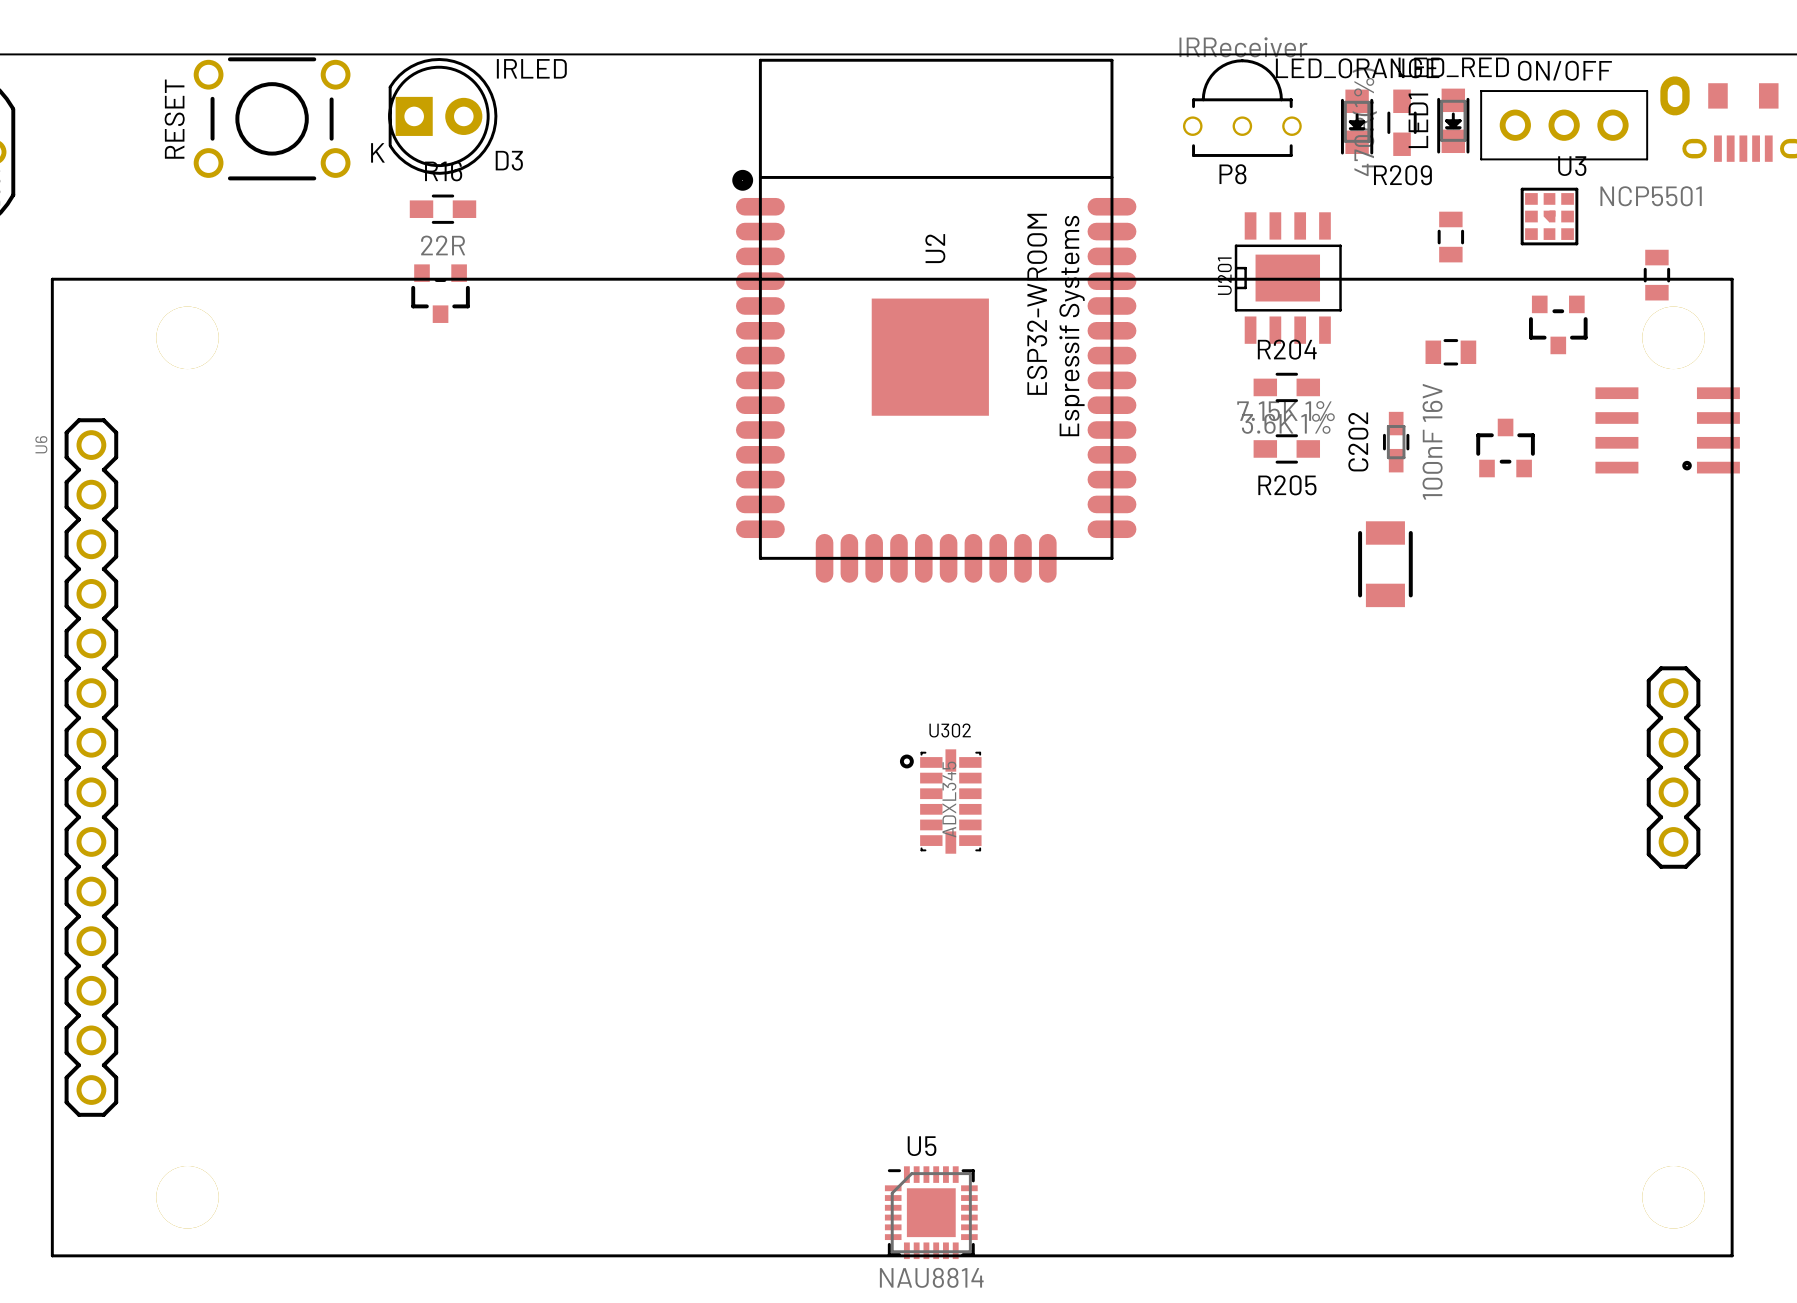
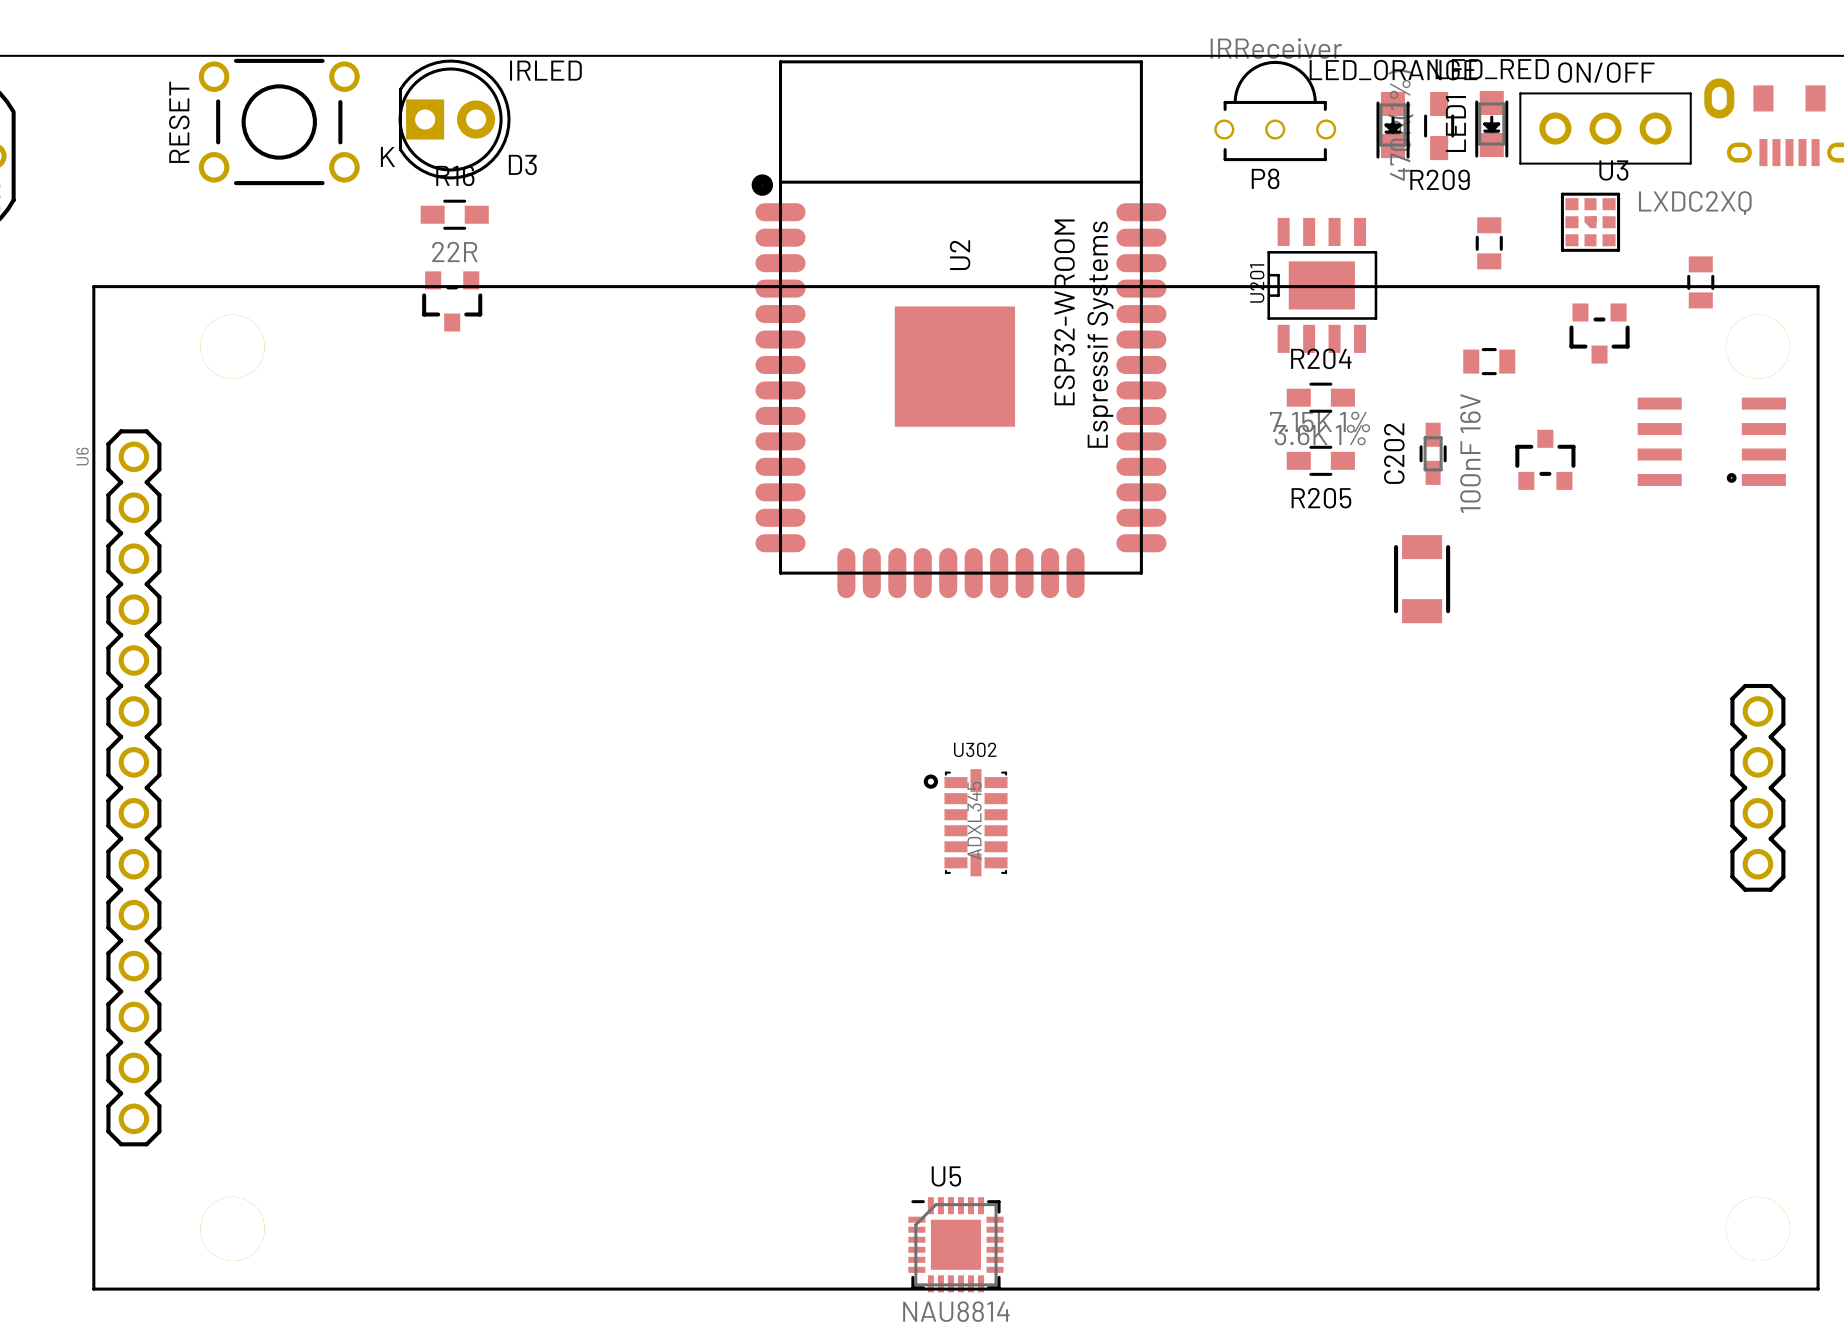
U3 value: NCP5501 (1651, 196) -> LXDC2XQ (1695, 202)
U6 position: (892, 767) -> (955, 787)

